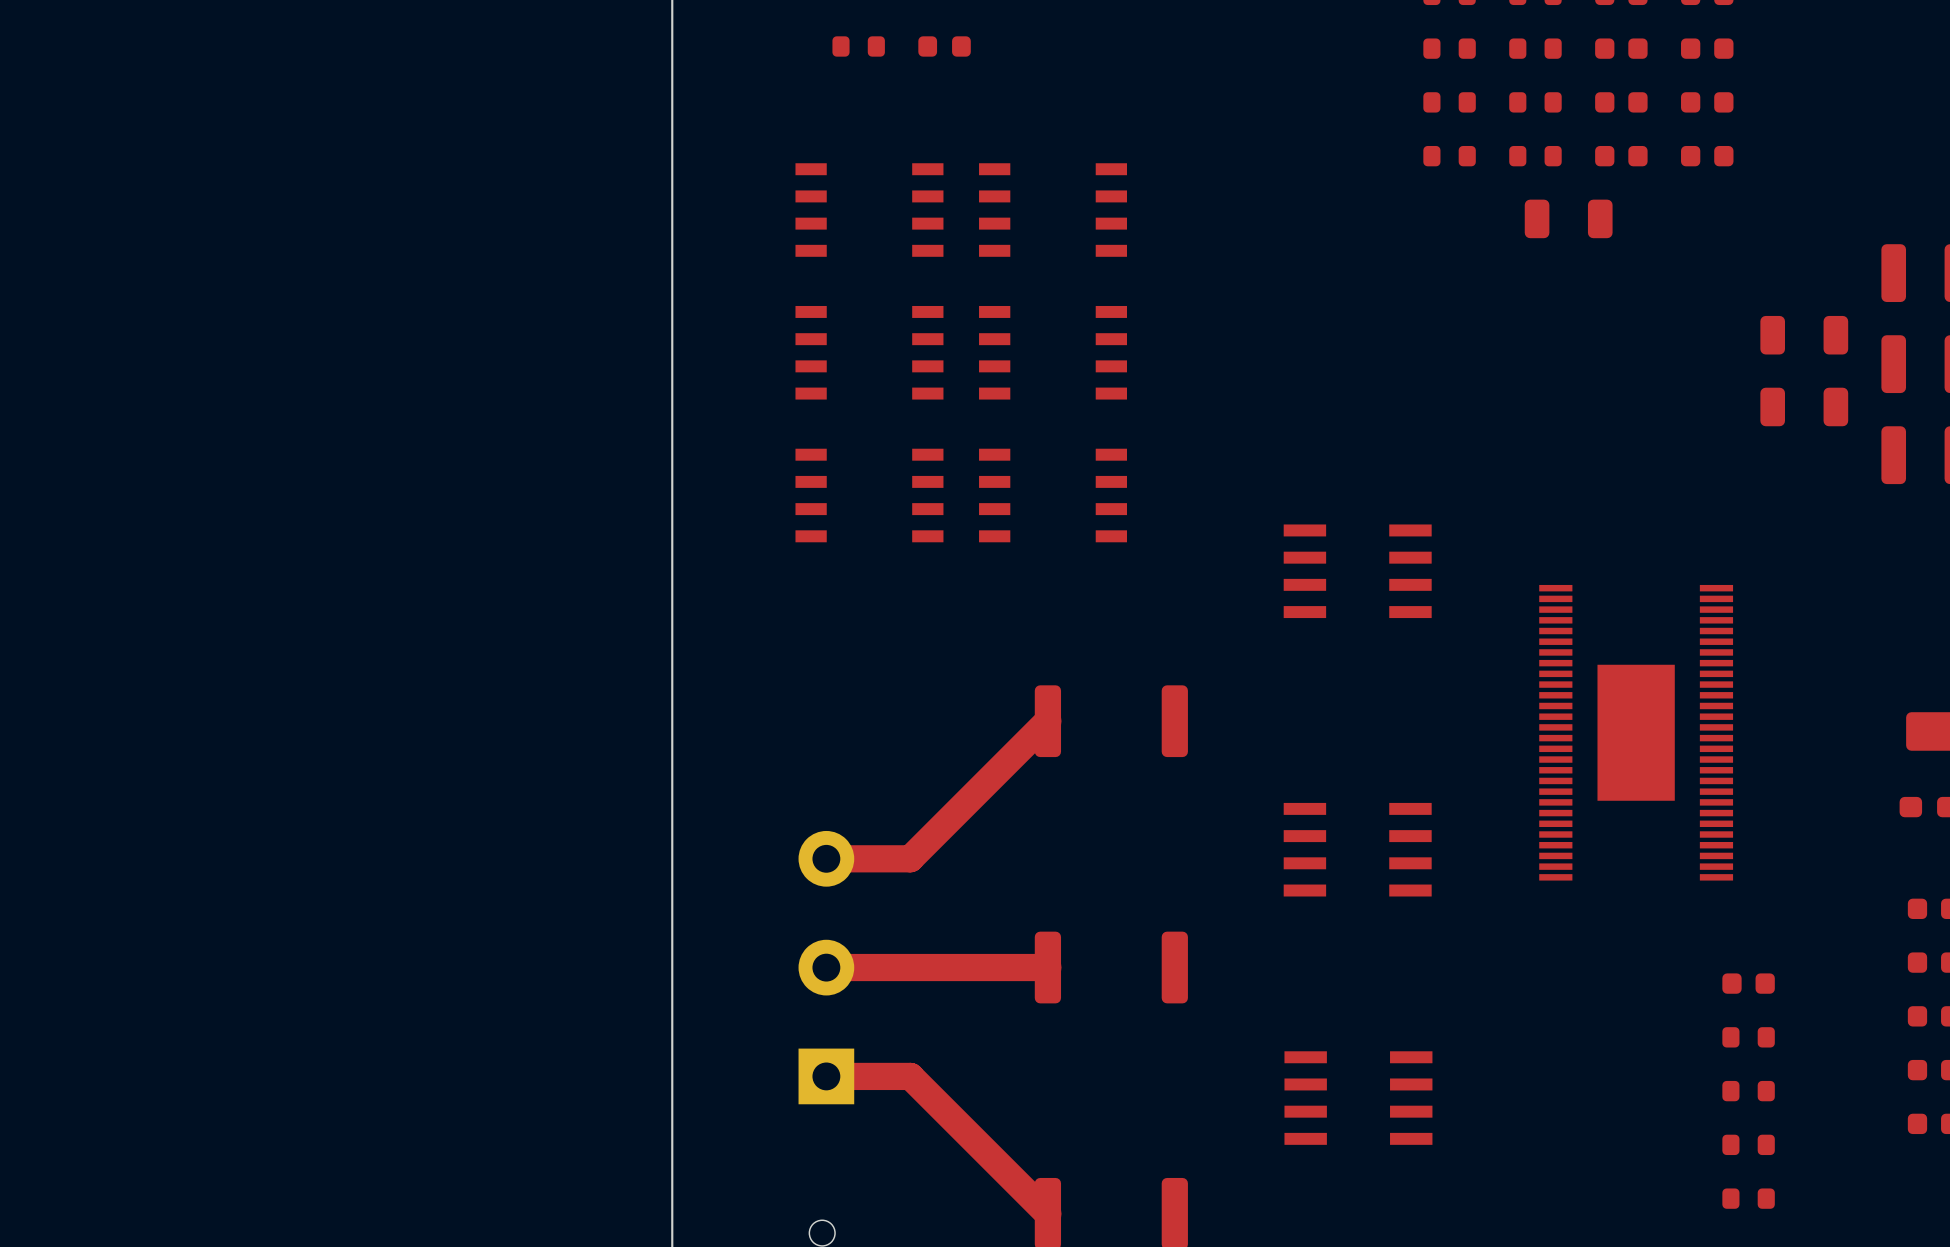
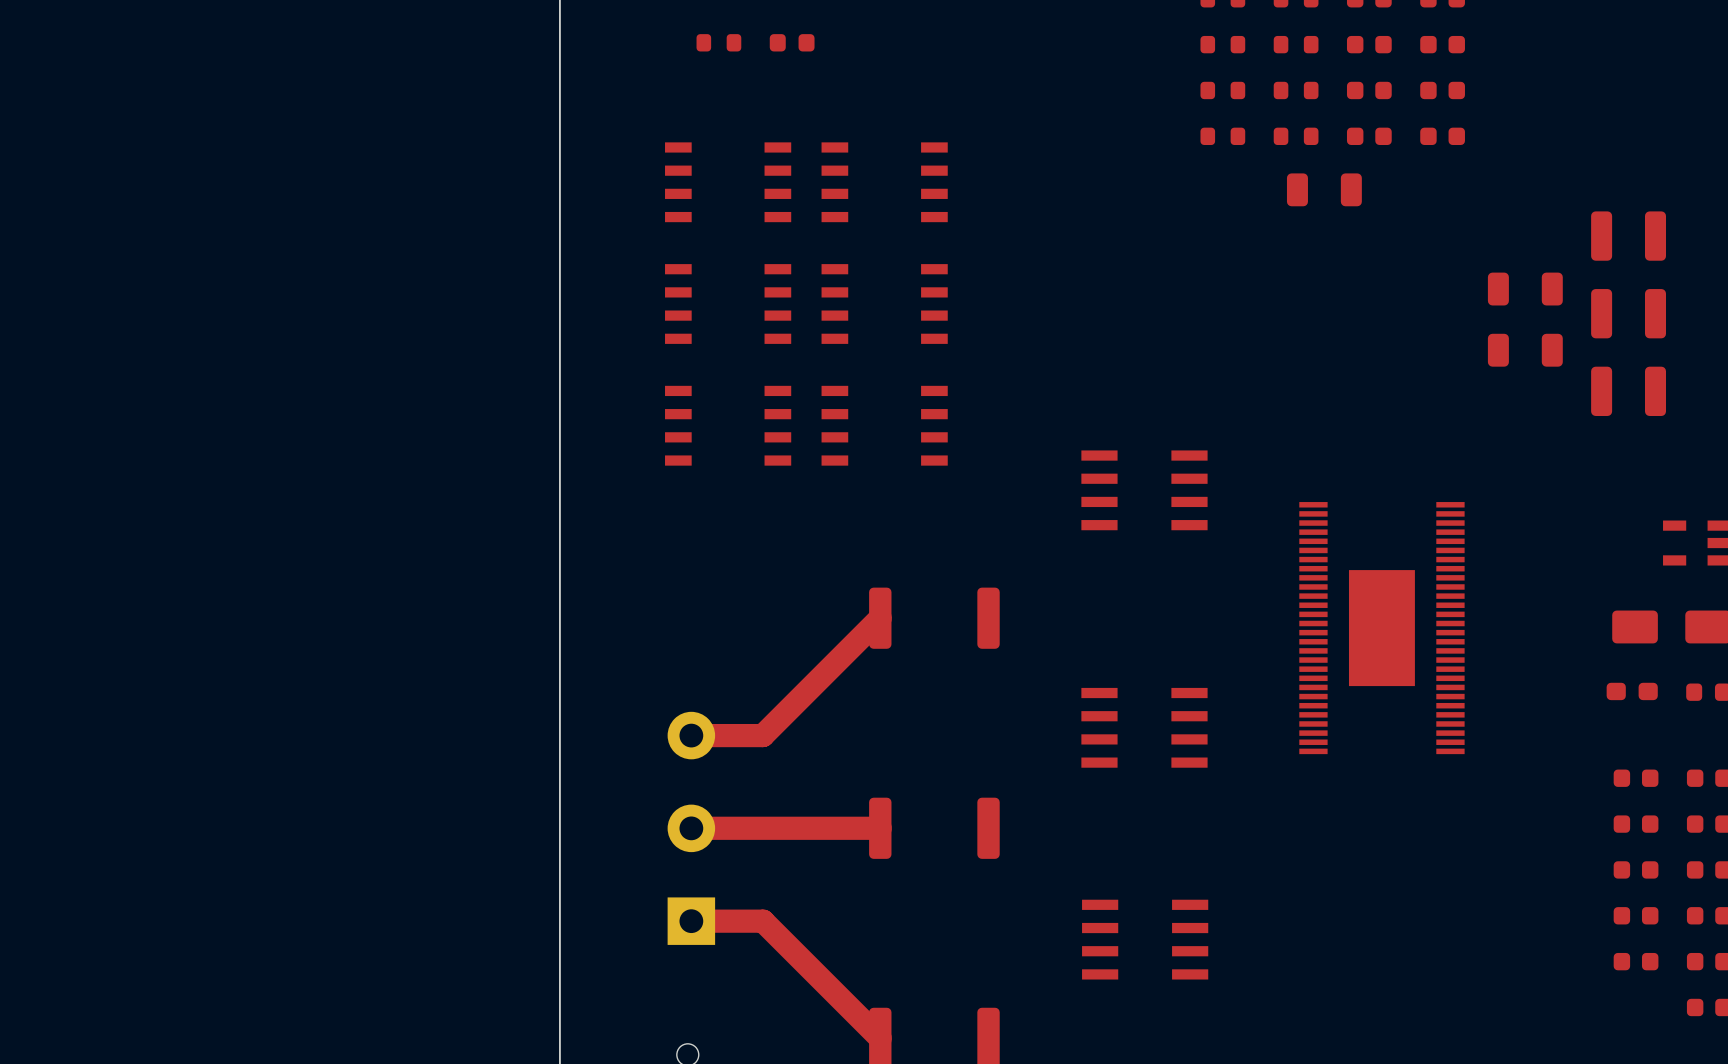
part: (1748, 983) -> none
part: (1748, 1037) -> none
part: (1748, 1091) -> none
part: (1748, 1144) -> none
part: (1748, 1198) -> none

